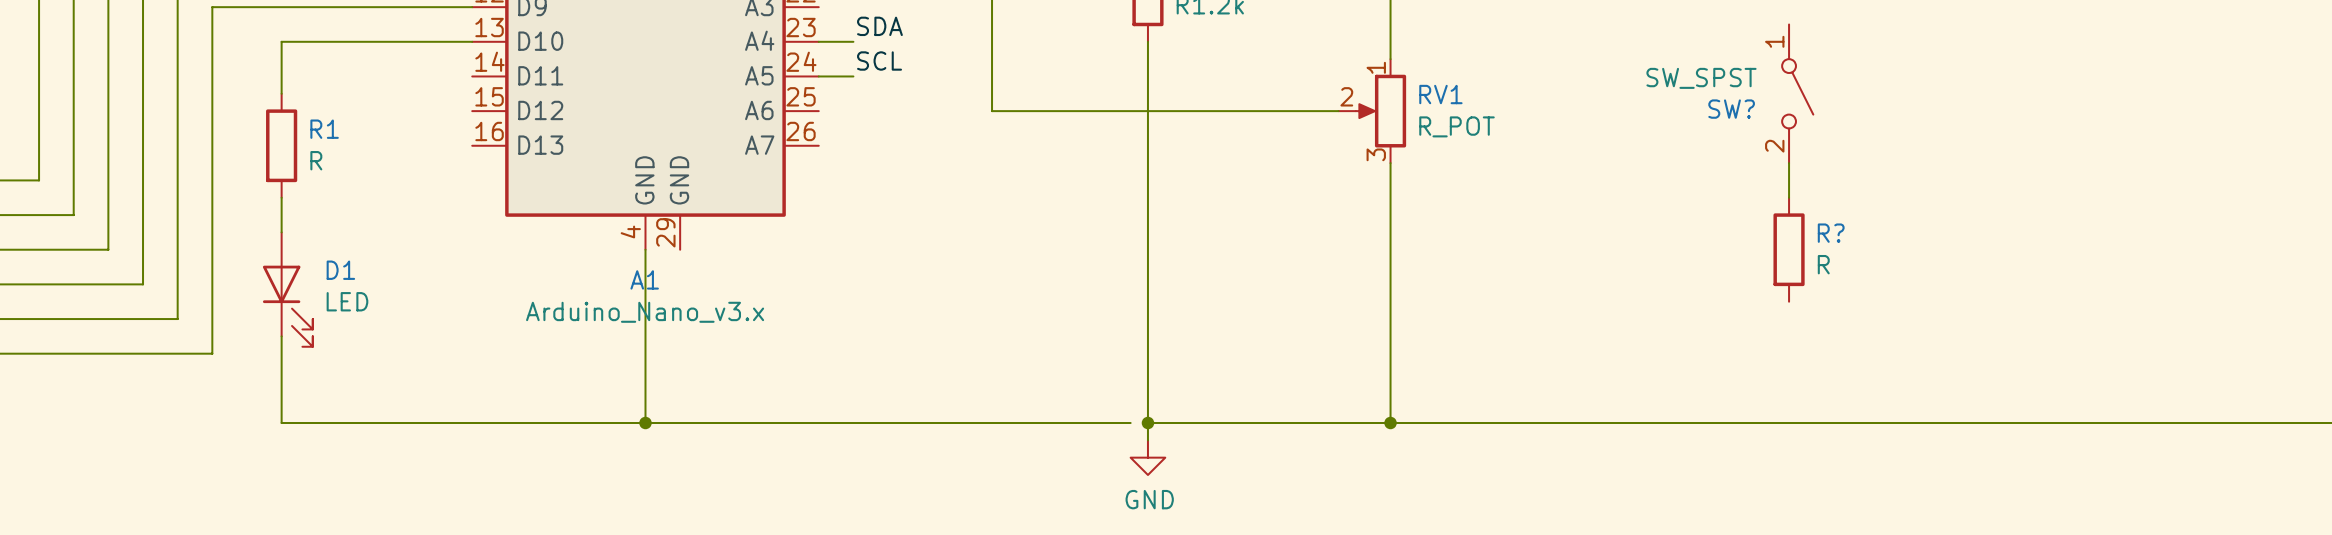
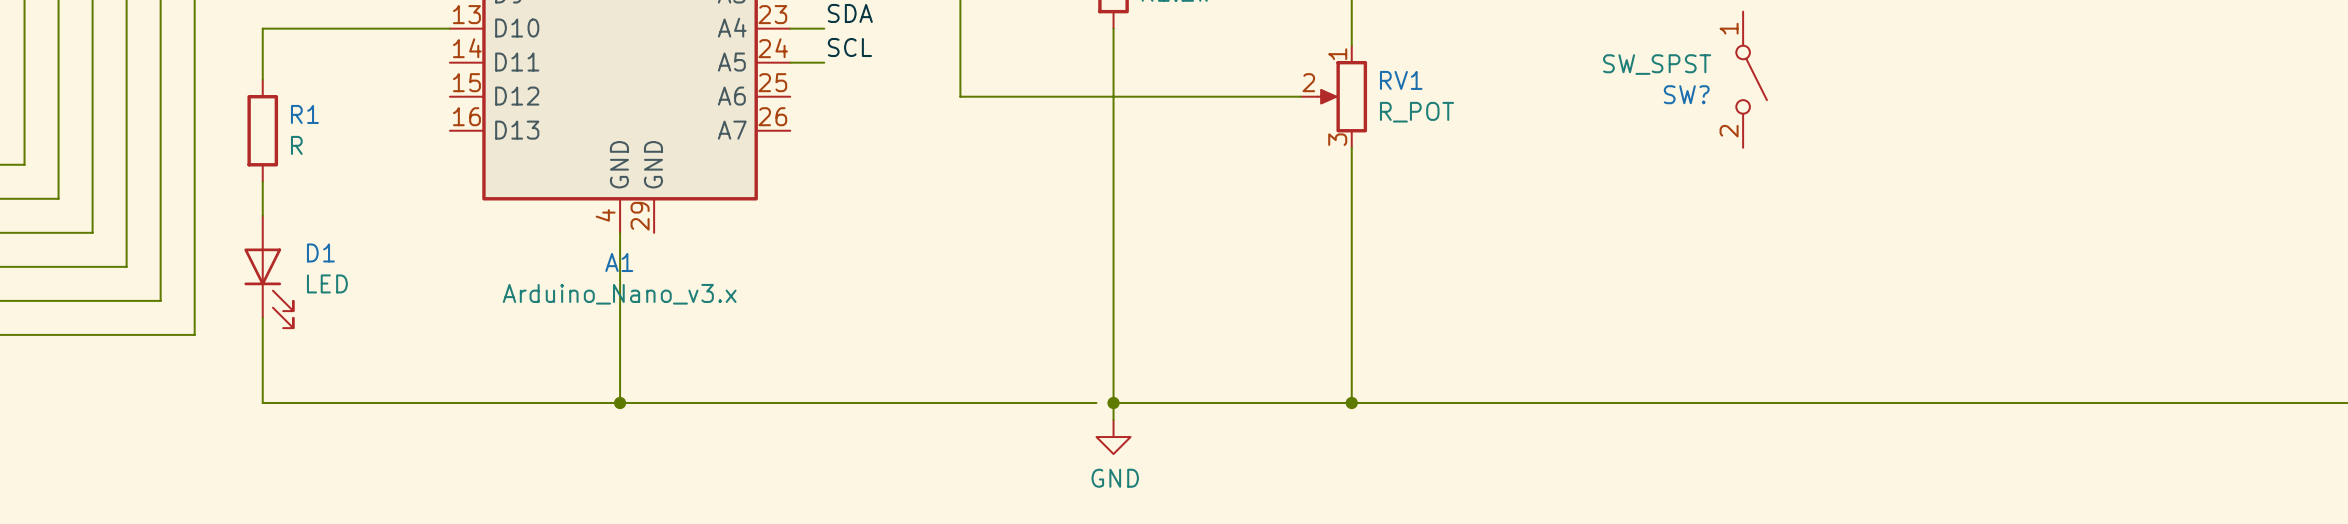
wire: (1789, 163) (1789, 197) -> none
R?: R (1789, 249) -> none

